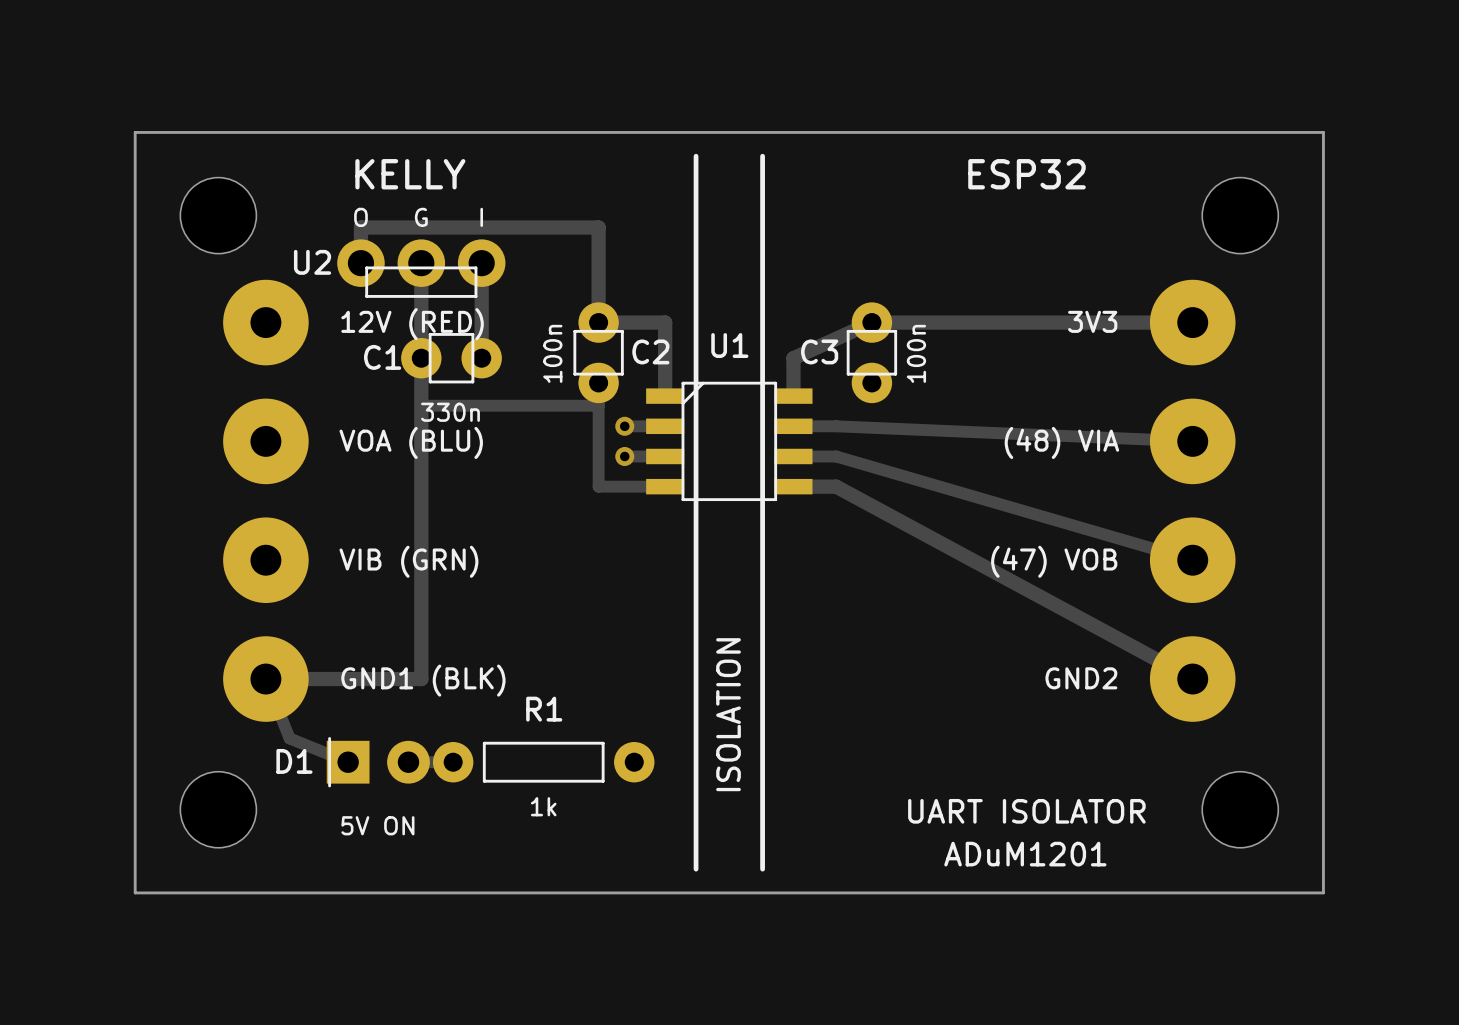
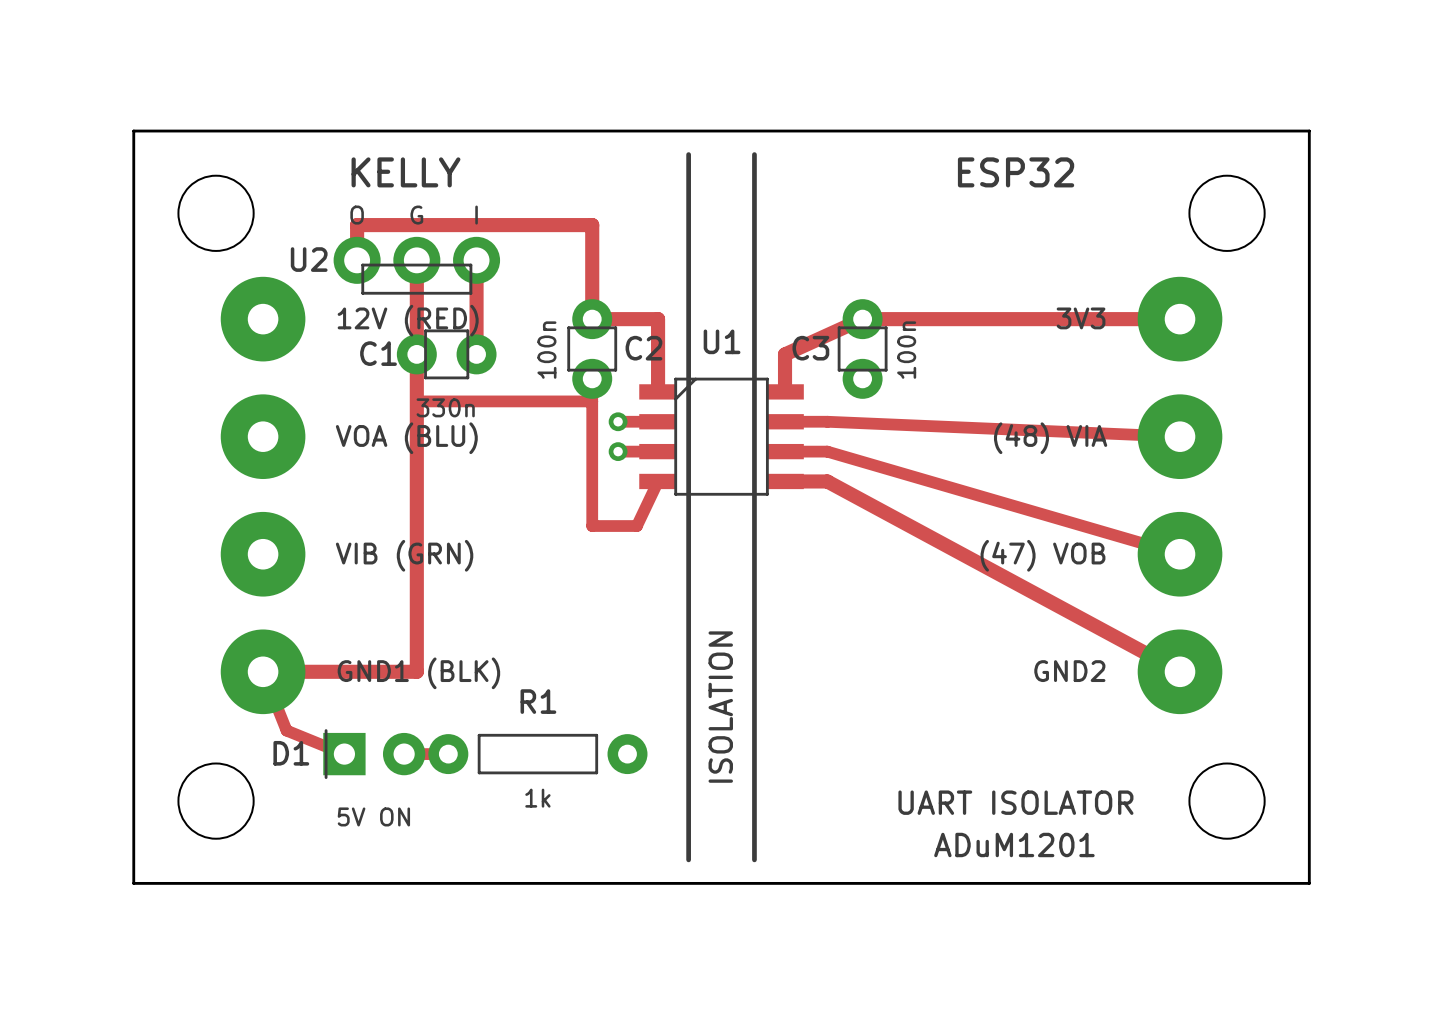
track: (598, 486) (665, 486) -> (592, 481) (592, 526) (636, 526) (658, 481)

